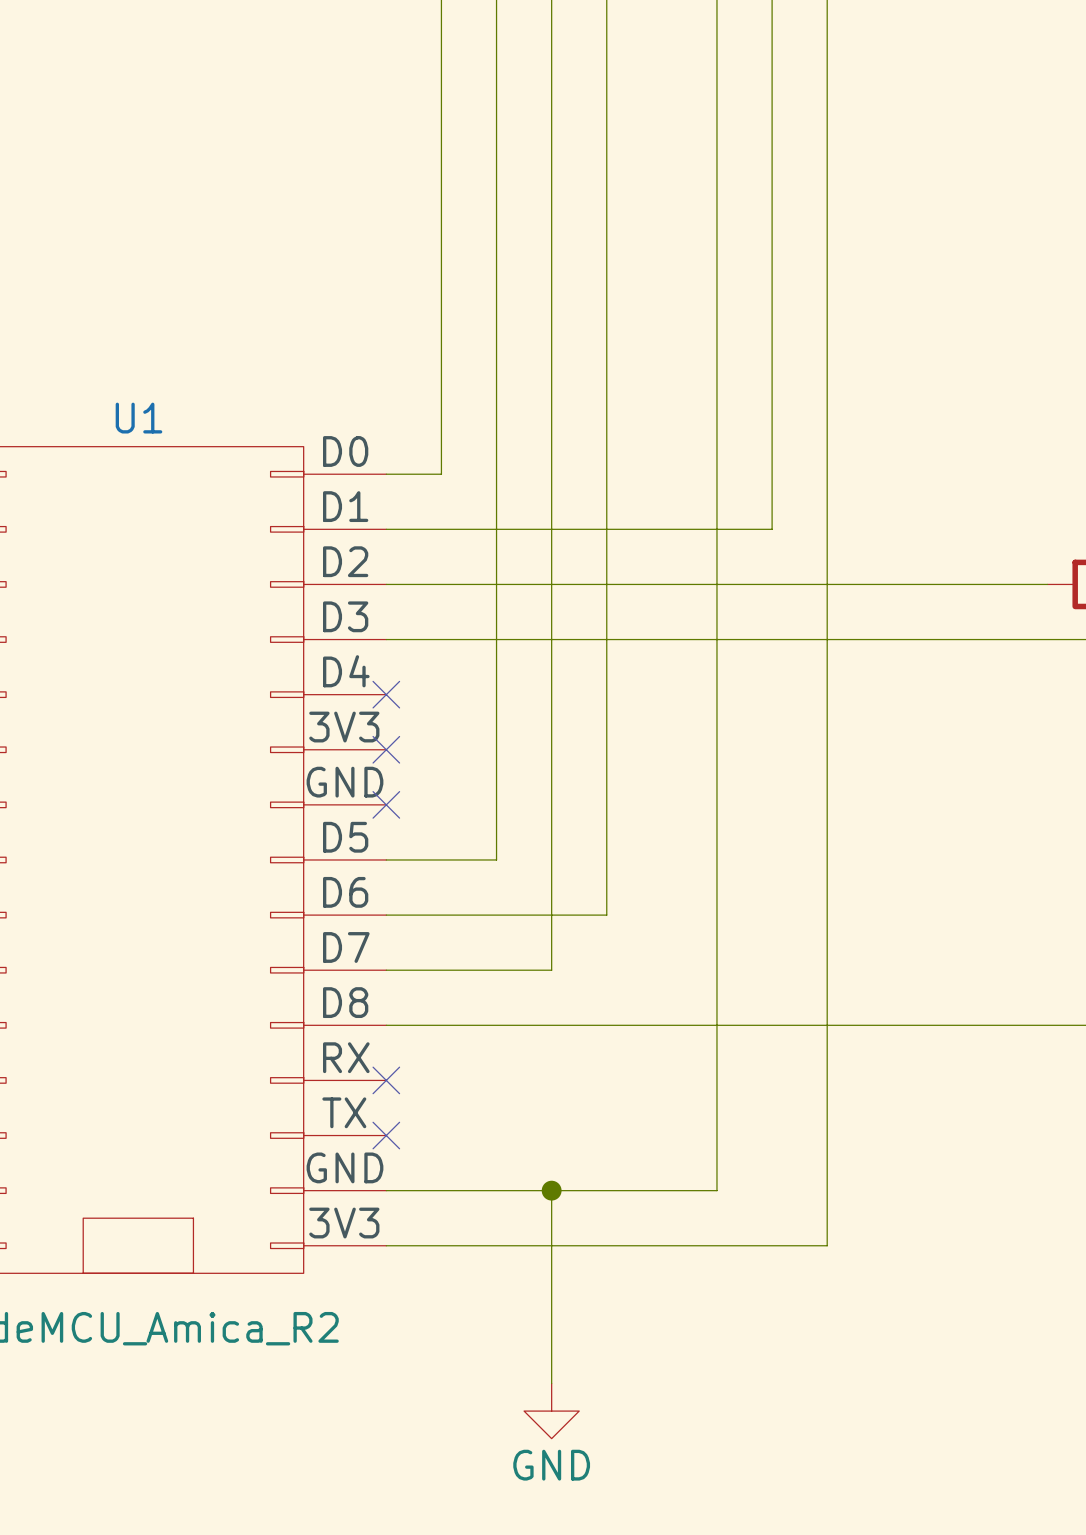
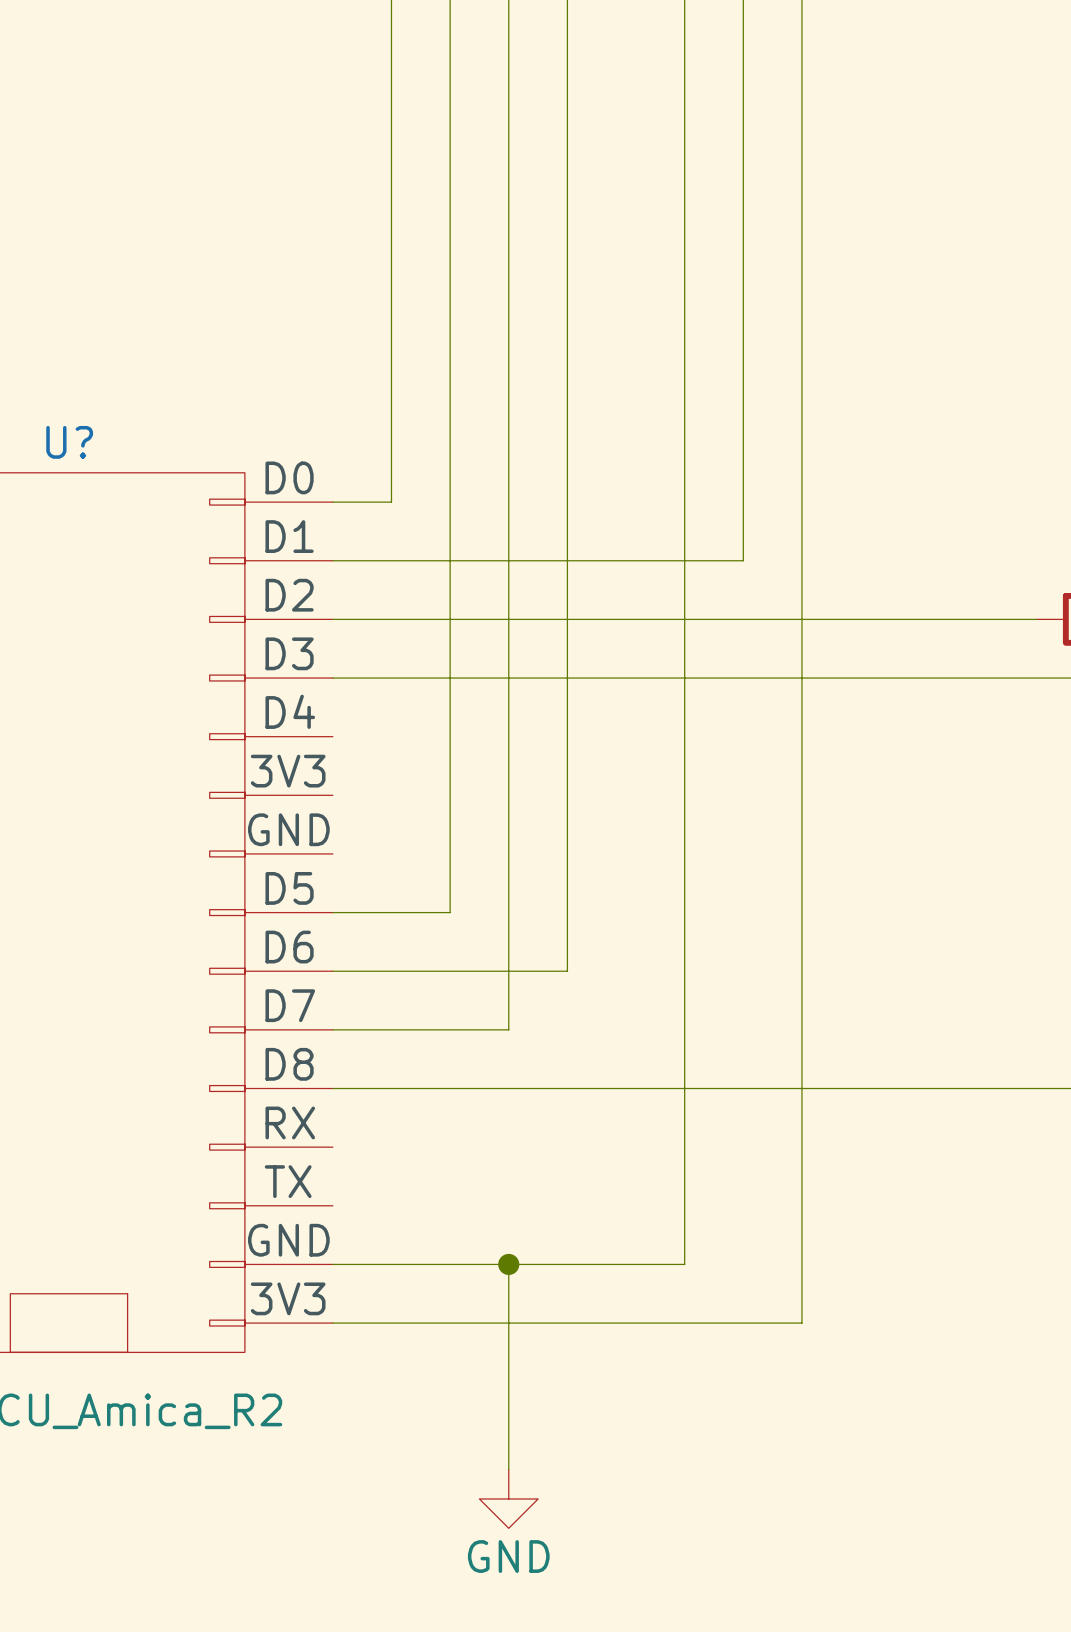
U1 name: U1 (138, 418) -> U? (69, 442)
no-connect mark: (386, 694) -> none
no-connect mark: (386, 749) -> none
no-connect mark: (386, 804) -> none
no-connect mark: (386, 1080) -> none
no-connect mark: (386, 1135) -> none

